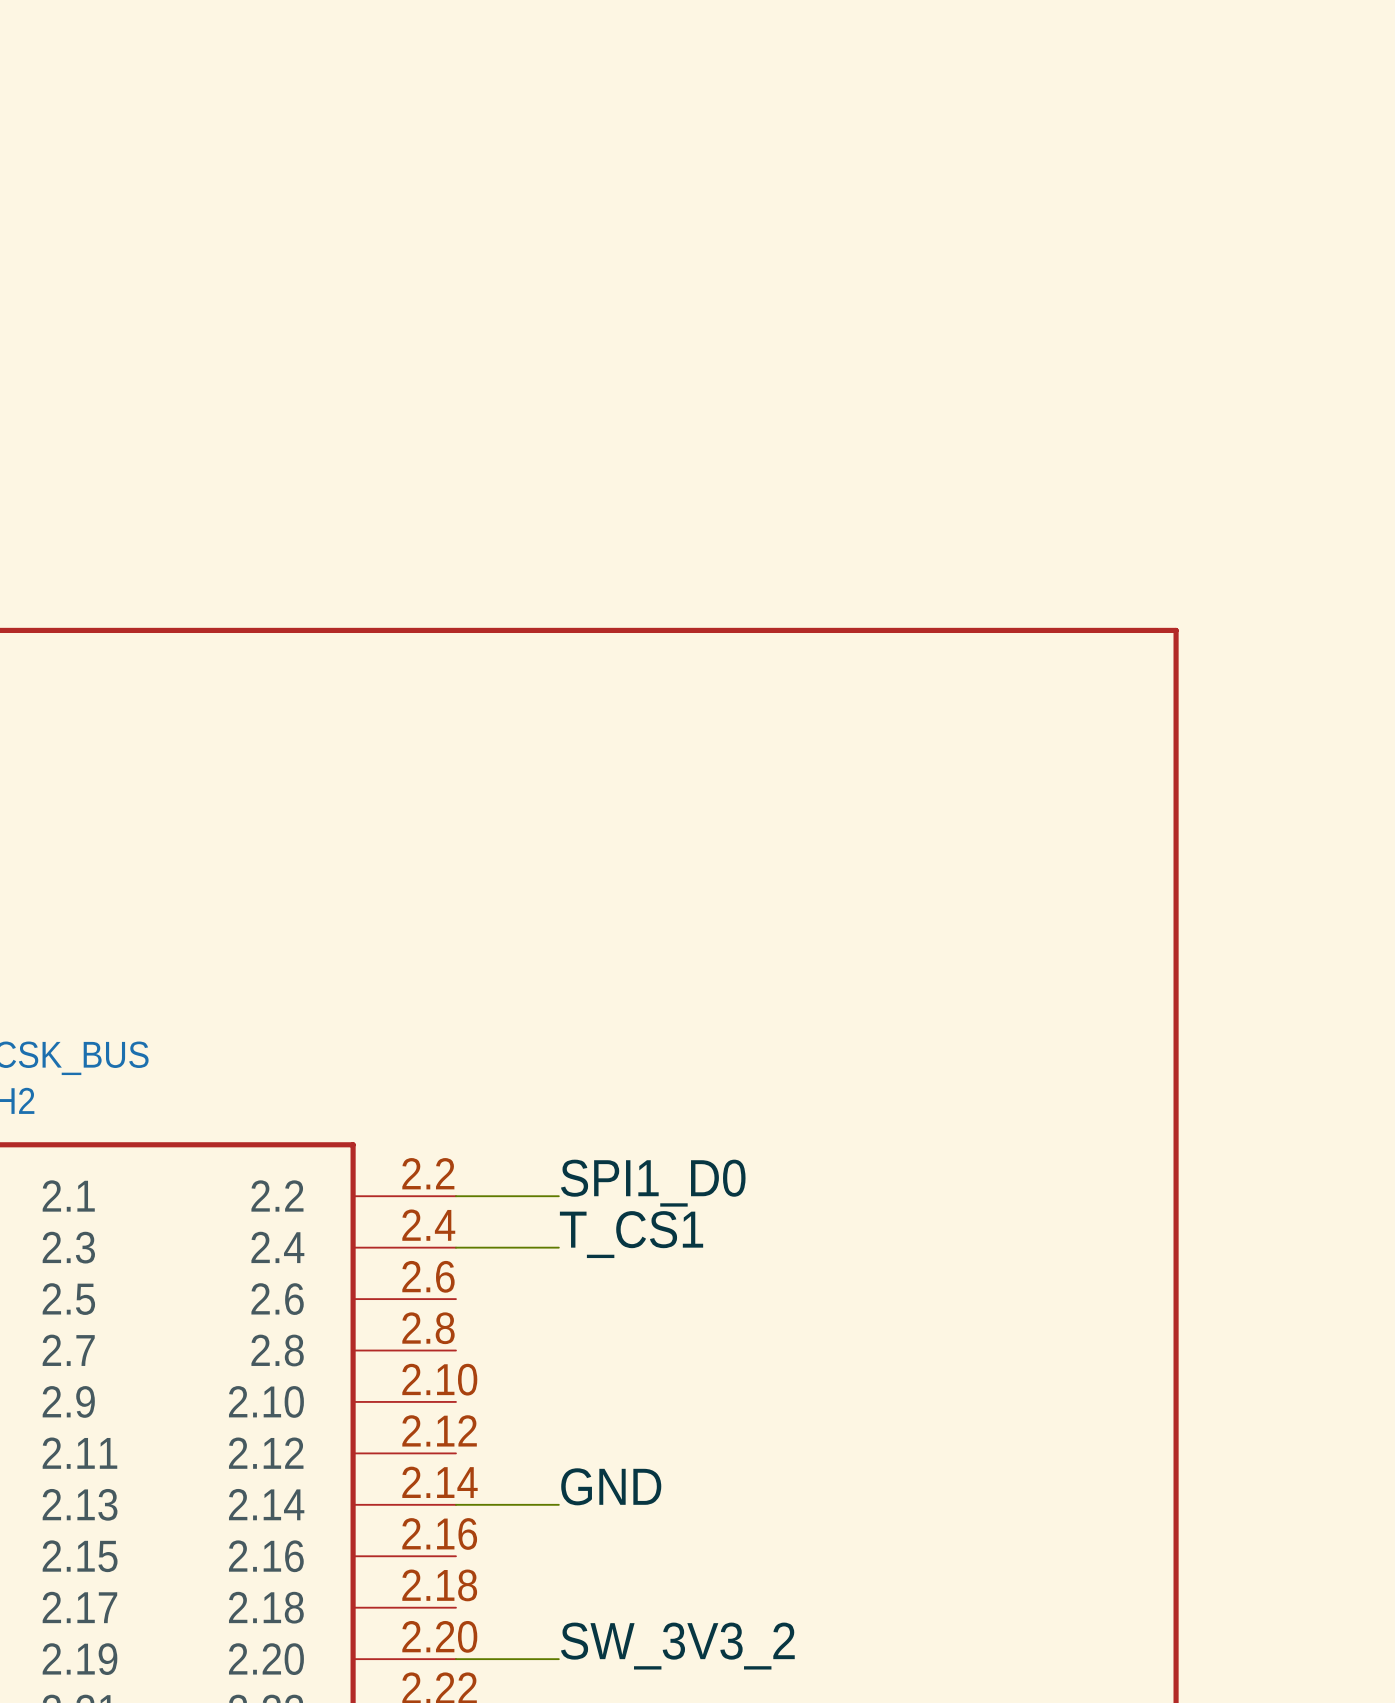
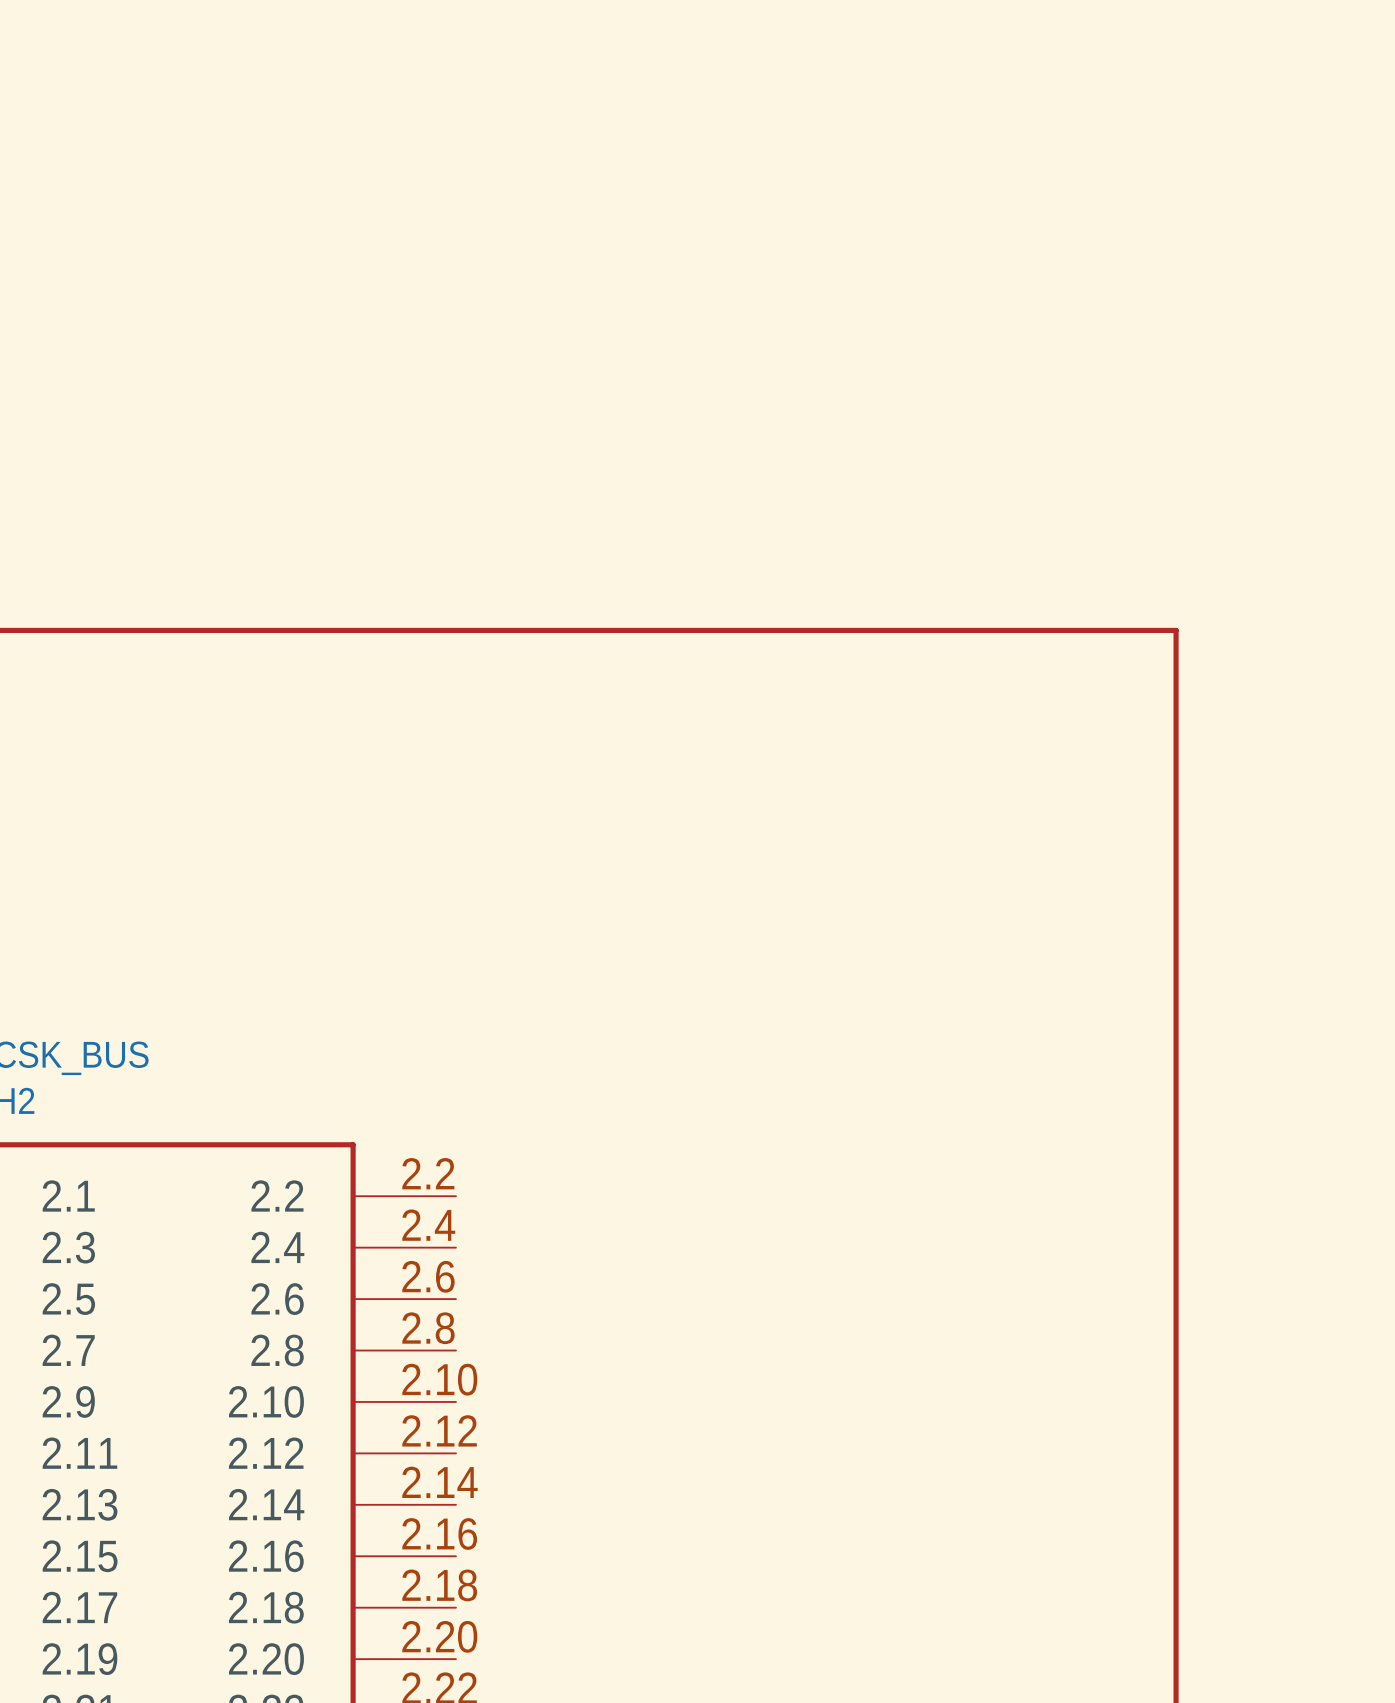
label: SPI1_D0 (653, 1183) -> none
wire: (455, 1196) (558, 1196) -> none
label: T_CS1 (631, 1234) -> none
wire: (455, 1247) (558, 1247) -> none
label: GND (611, 1486) -> none
wire: (455, 1504) (558, 1504) -> none
label: SW_3V3_2 (677, 1646) -> none
wire: (455, 1659) (558, 1659) -> none

